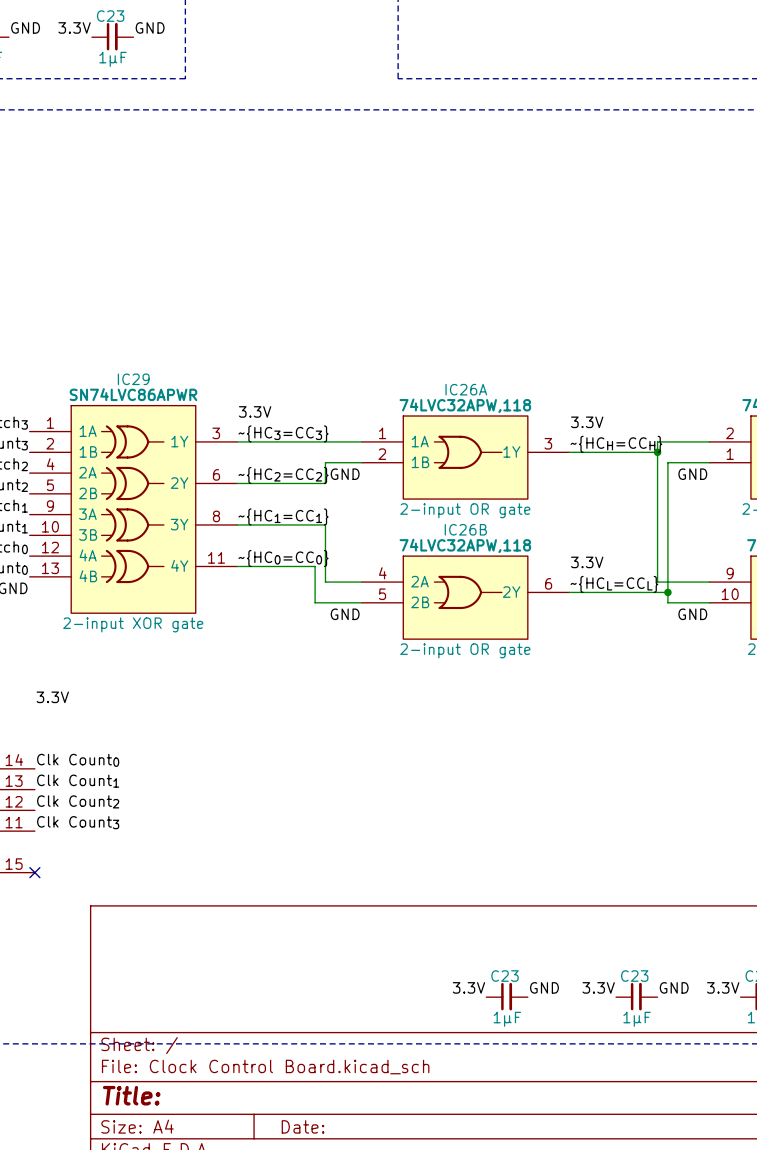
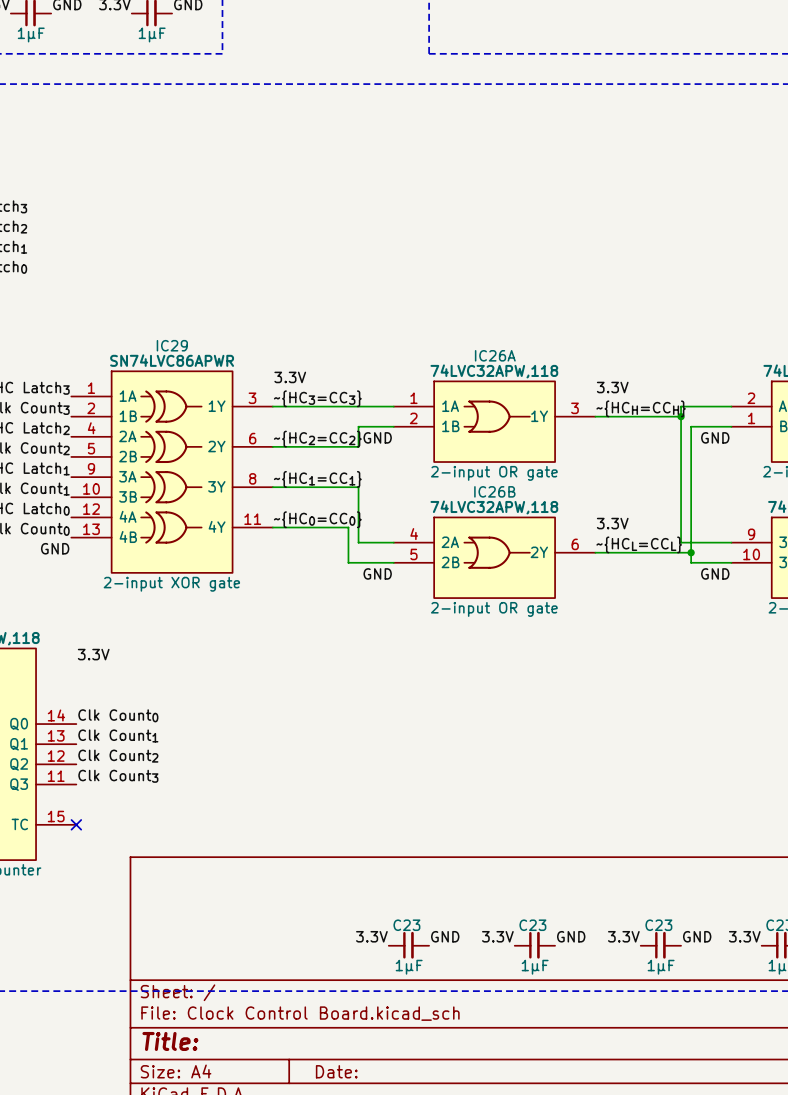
label: none -> 3.3V (371, 936)
label: none -> GND (445, 936)
C23: none -> 1μF (408, 945)

